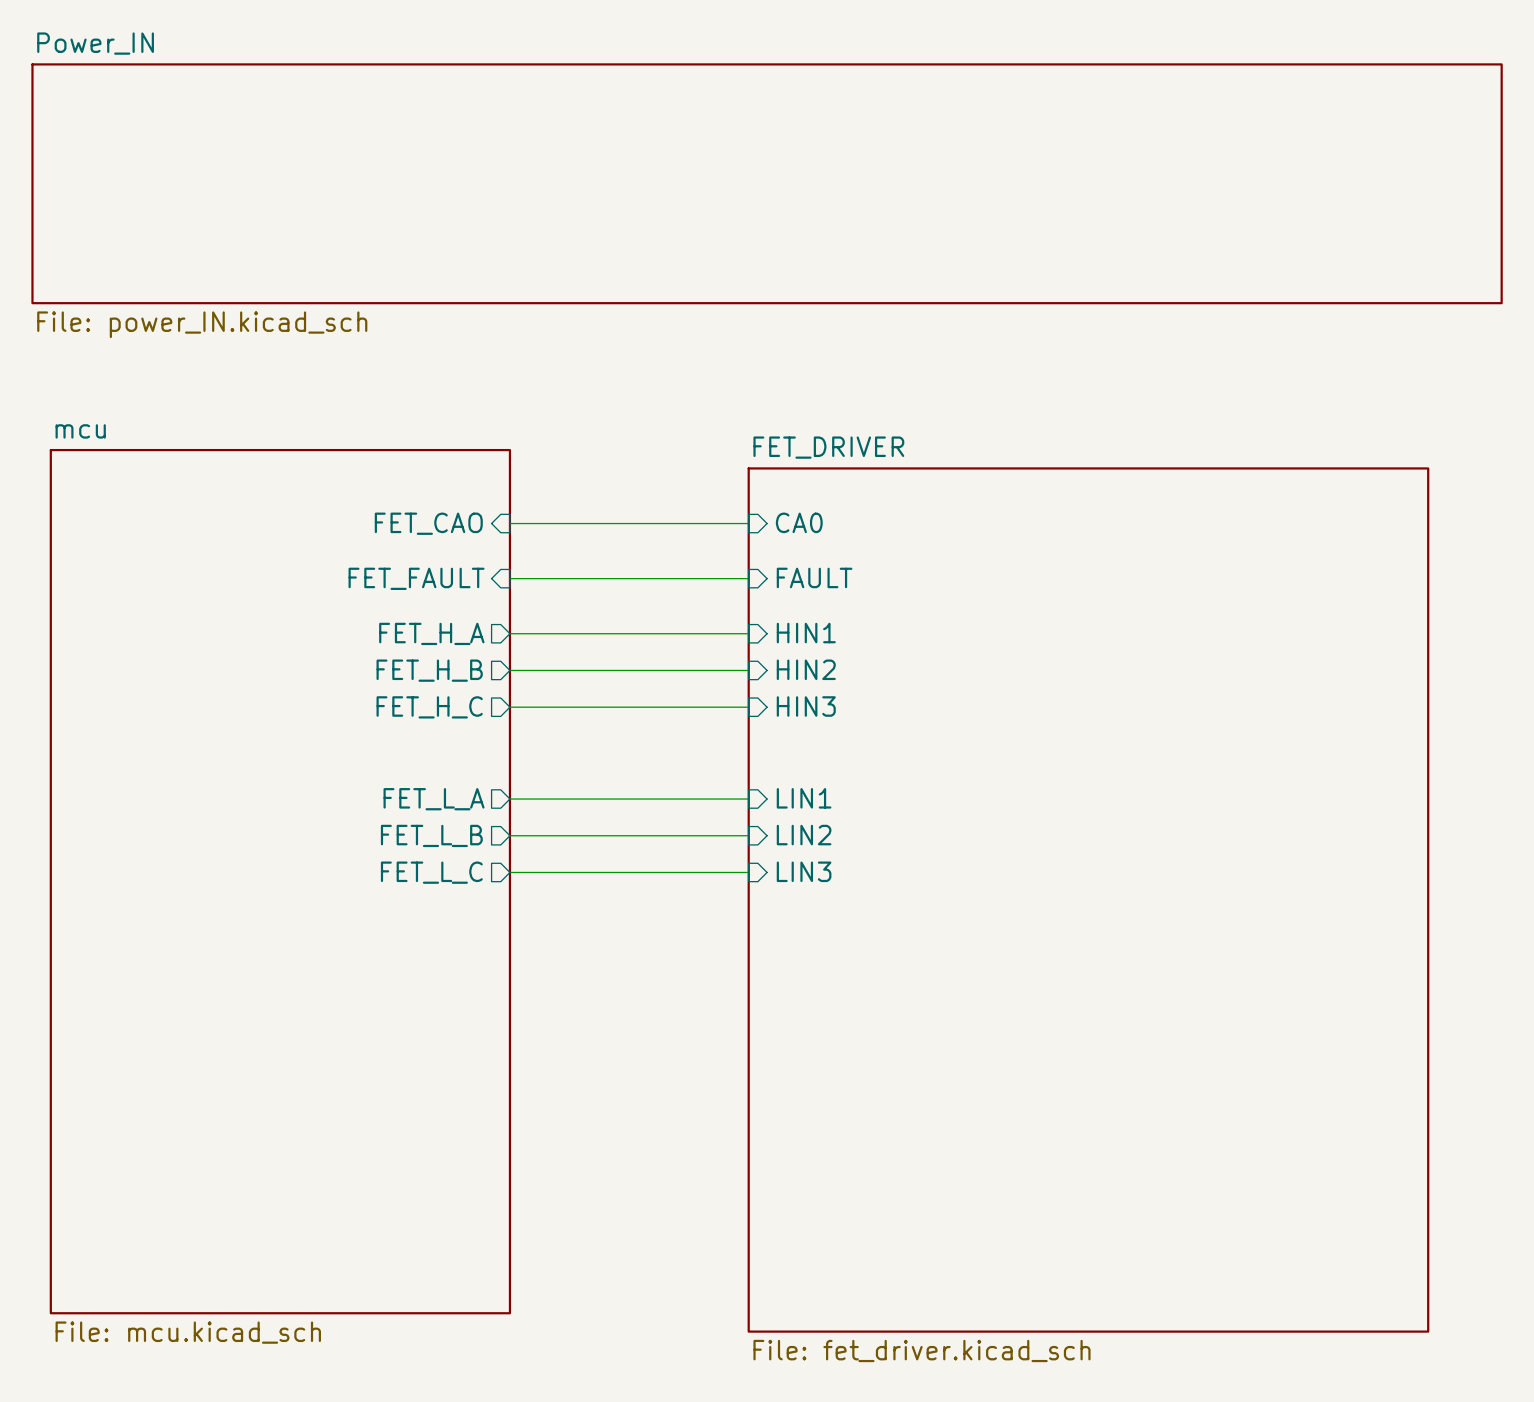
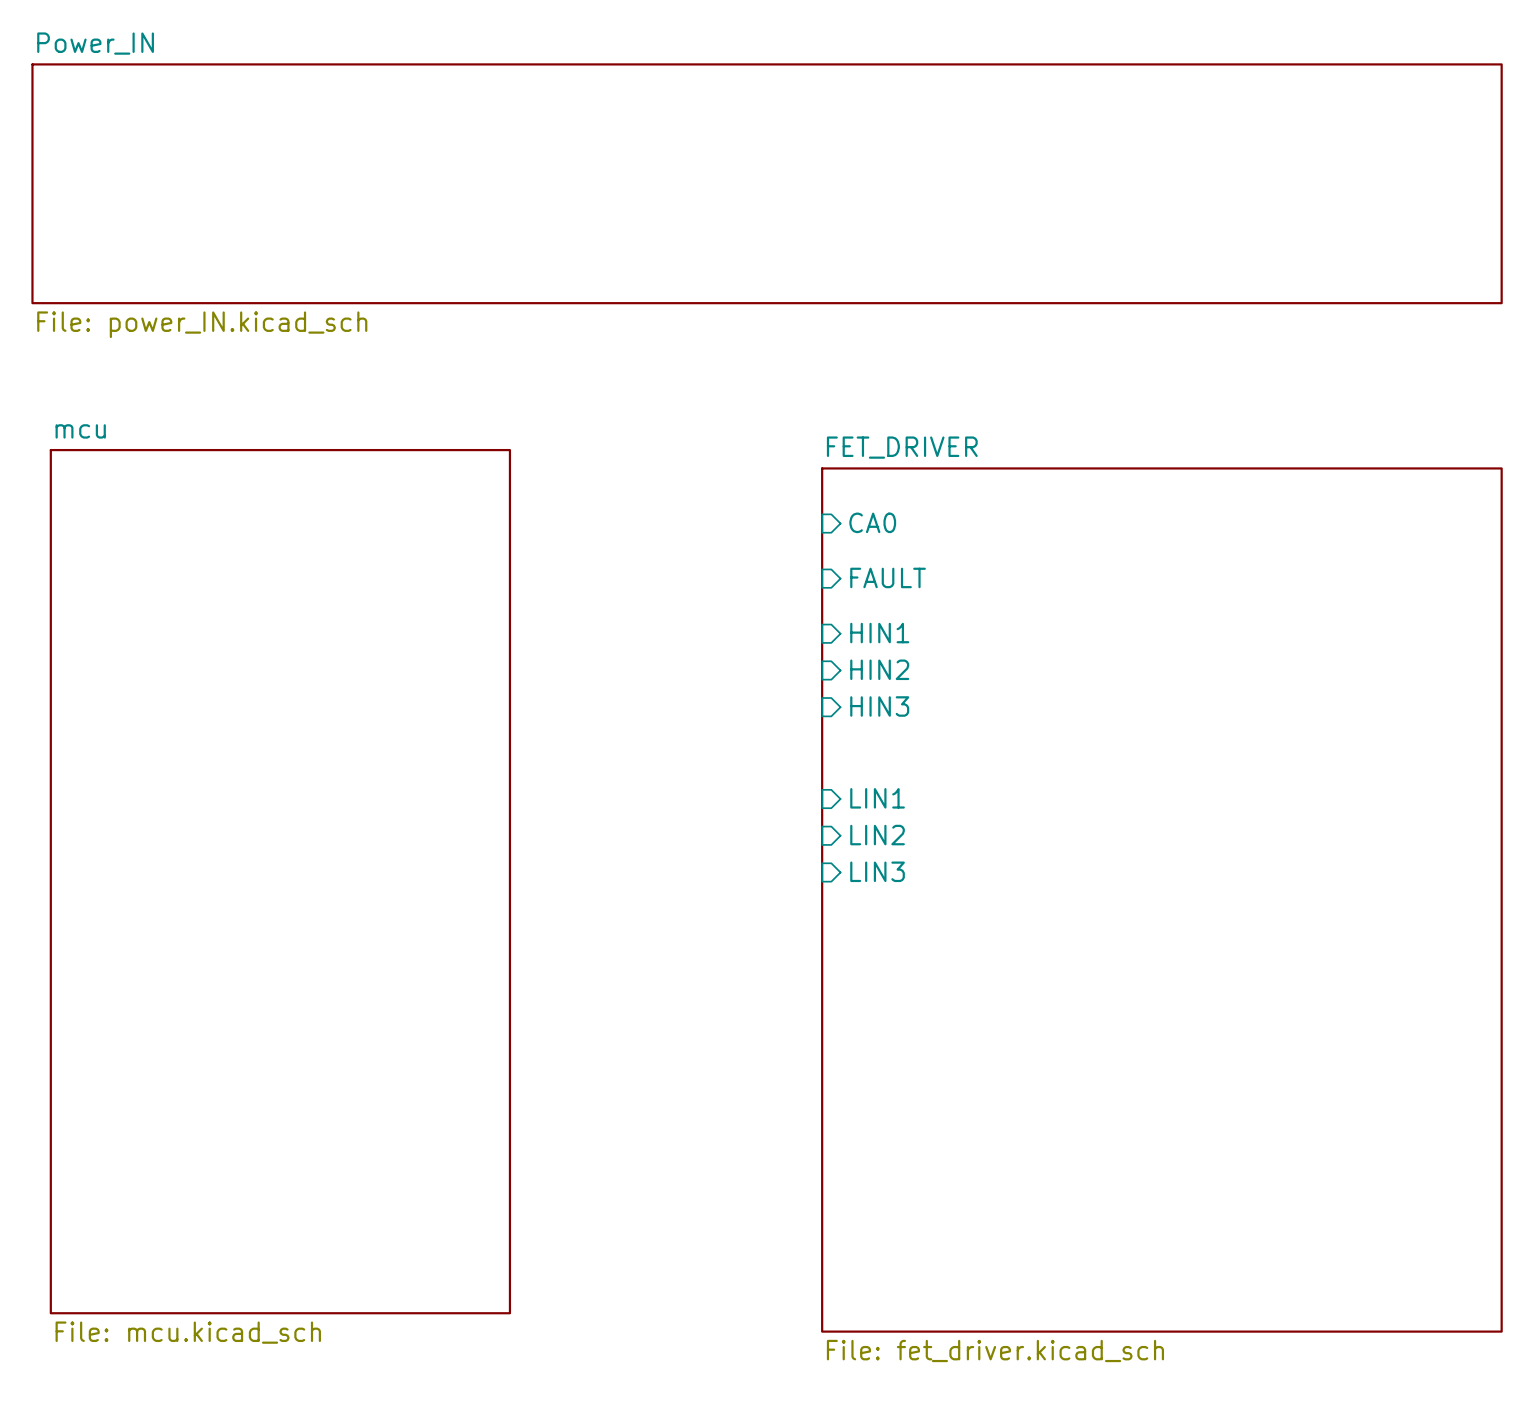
sheet pin position: CA0 (799, 522) -> CA0 (872, 522)
sheet pin: FET_CAO (428, 523) -> none
wire: (509, 523) (748, 523) -> none
sheet pin position: FAULT (814, 577) -> FAULT (888, 577)
sheet pin: FET_FAULT (416, 578) -> none
wire: (509, 578) (748, 578) -> none
sheet pin: FET_H_A (431, 633) -> none
wire: (509, 633) (748, 633) -> none
sheet pin position: HIN1 (806, 633) -> HIN1 (879, 633)
sheet pin position: HIN2 (806, 669) -> HIN2 (879, 669)
sheet pin: FET_H_B (429, 670) -> none
wire: (509, 670) (748, 670) -> none
sheet pin position: HIN3 (806, 706) -> HIN3 (879, 706)
sheet pin: FET_H_C (429, 707) -> none
wire: (509, 707) (748, 707) -> none
sheet pin position: LIN1 (804, 798) -> LIN1 (877, 798)
sheet pin: FET_L_A (434, 799) -> none
wire: (509, 799) (748, 799) -> none
sheet pin: FET_L_B (431, 835) -> none
wire: (509, 835) (748, 835) -> none
sheet pin position: LIN2 (804, 835) -> LIN2 (877, 835)
sheet pin position: LIN3 (804, 871) -> LIN3 (877, 871)
sheet pin: FET_L_C (431, 872) -> none
wire: (509, 872) (748, 872) -> none
sheet FET_DRIVER position: (1088, 900) -> (1161, 900)

